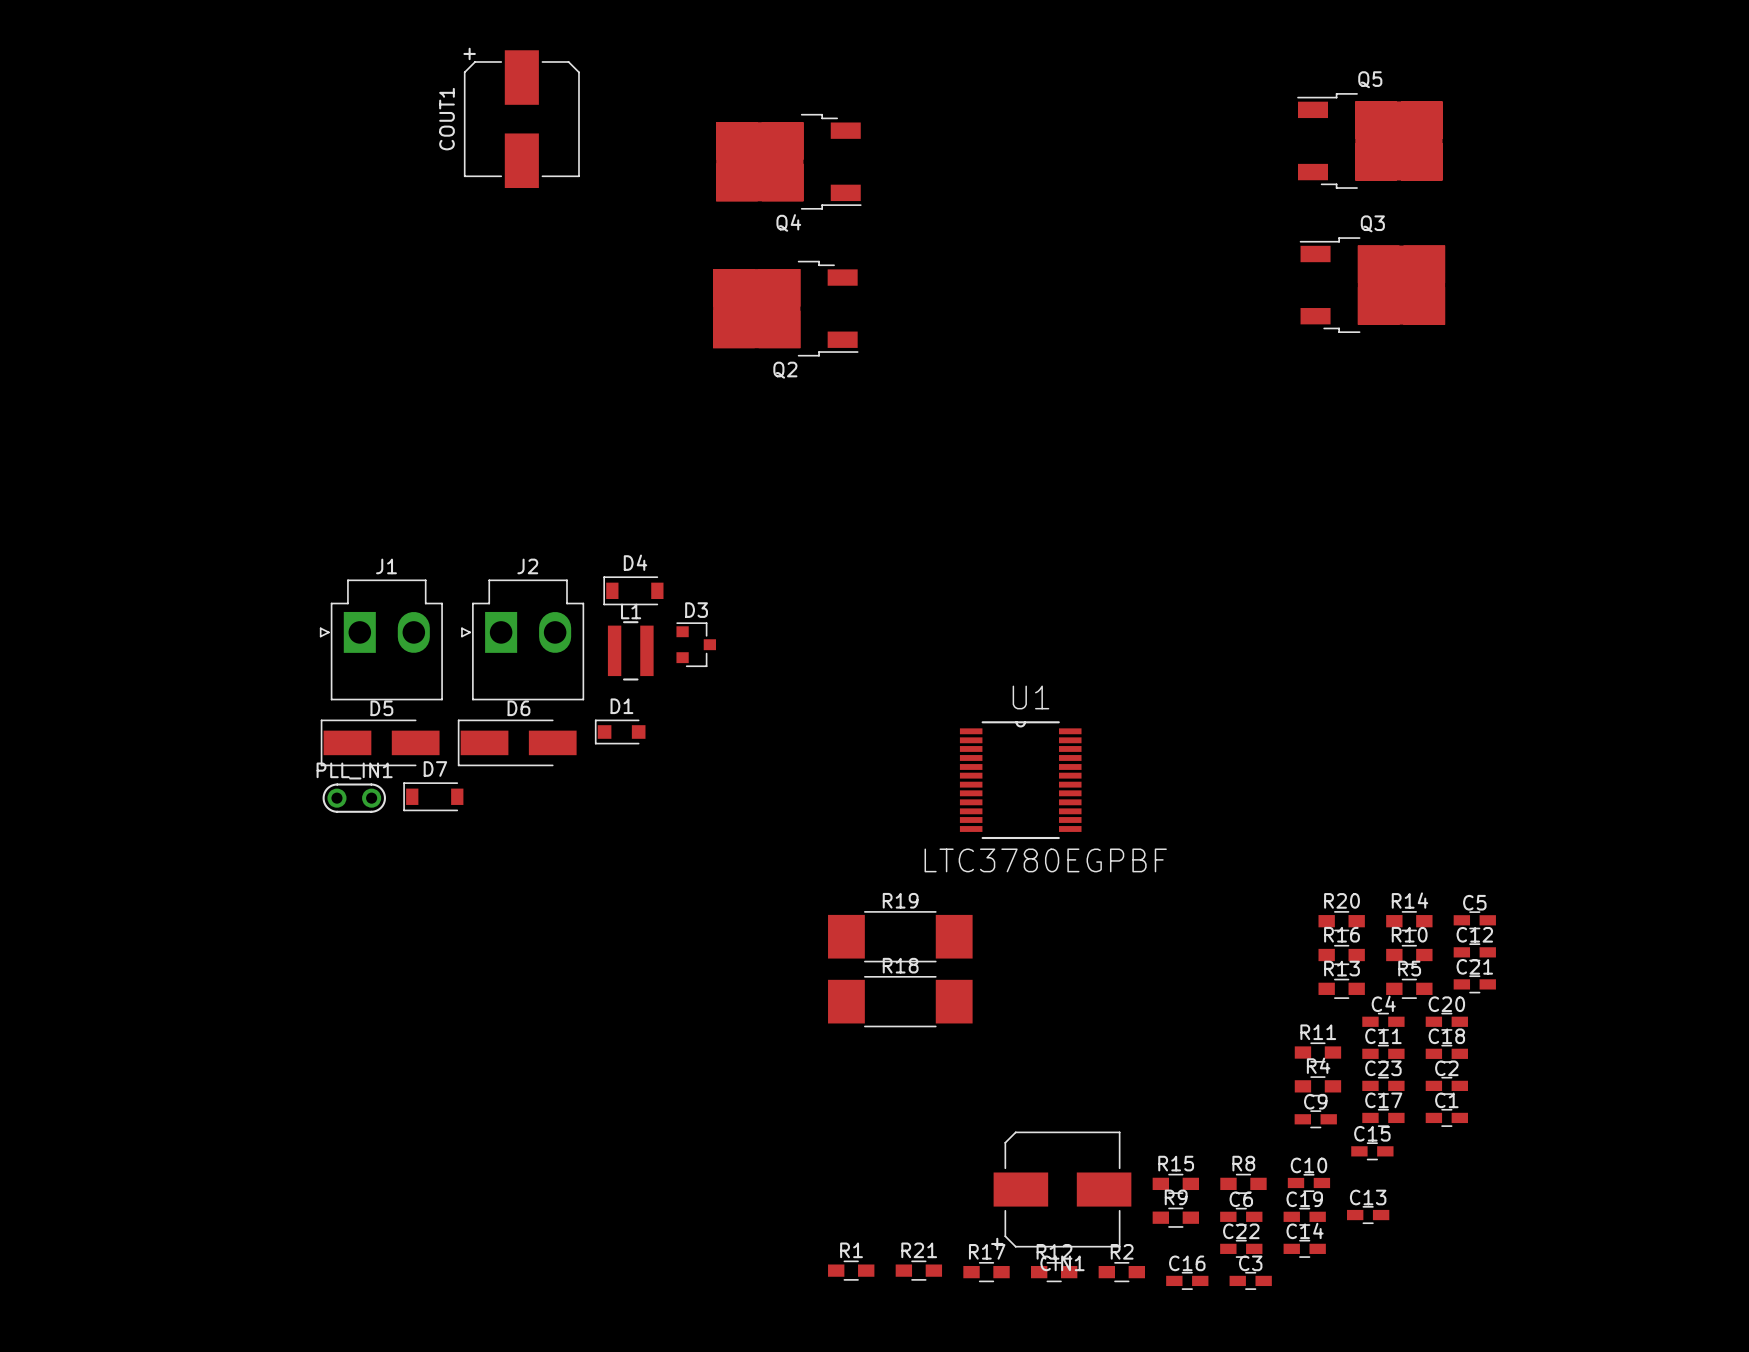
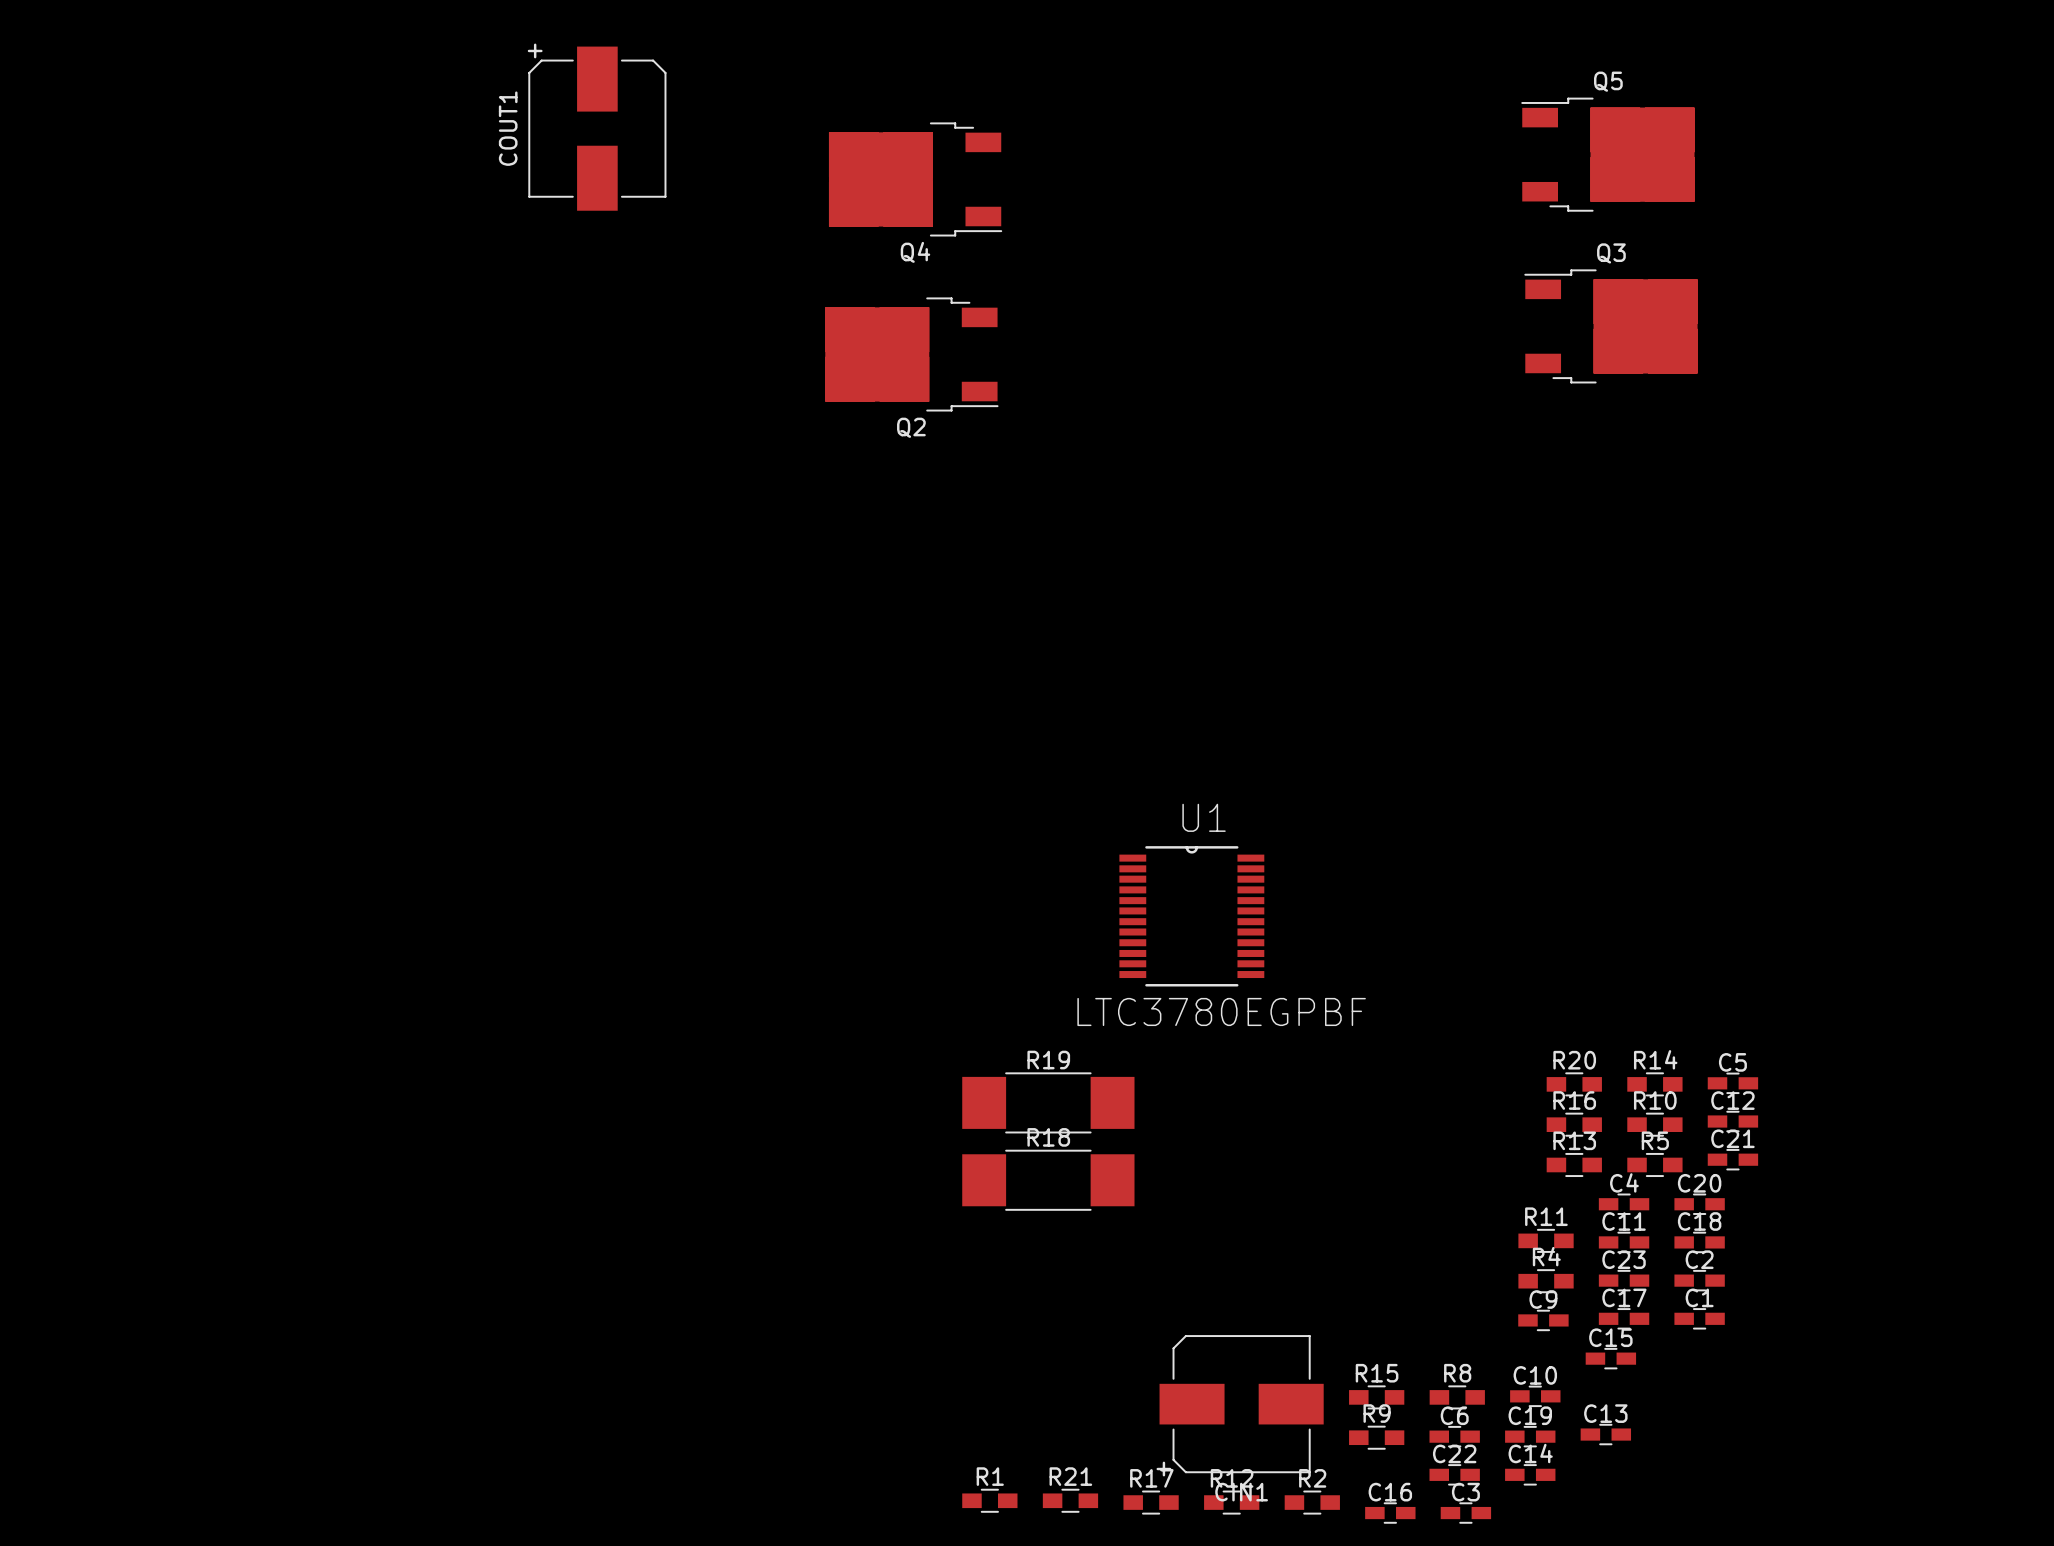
D4: (633, 590) -> none
J1: (381, 639) -> none
J2: (522, 639) -> none
D3: (696, 644) -> none
L1: (630, 650) -> none
D1: (620, 731) -> none
D5: (380, 742) -> none
D6: (517, 742) -> none
D7: (433, 796) -> none
PLL_IN1: (354, 798) -> none

